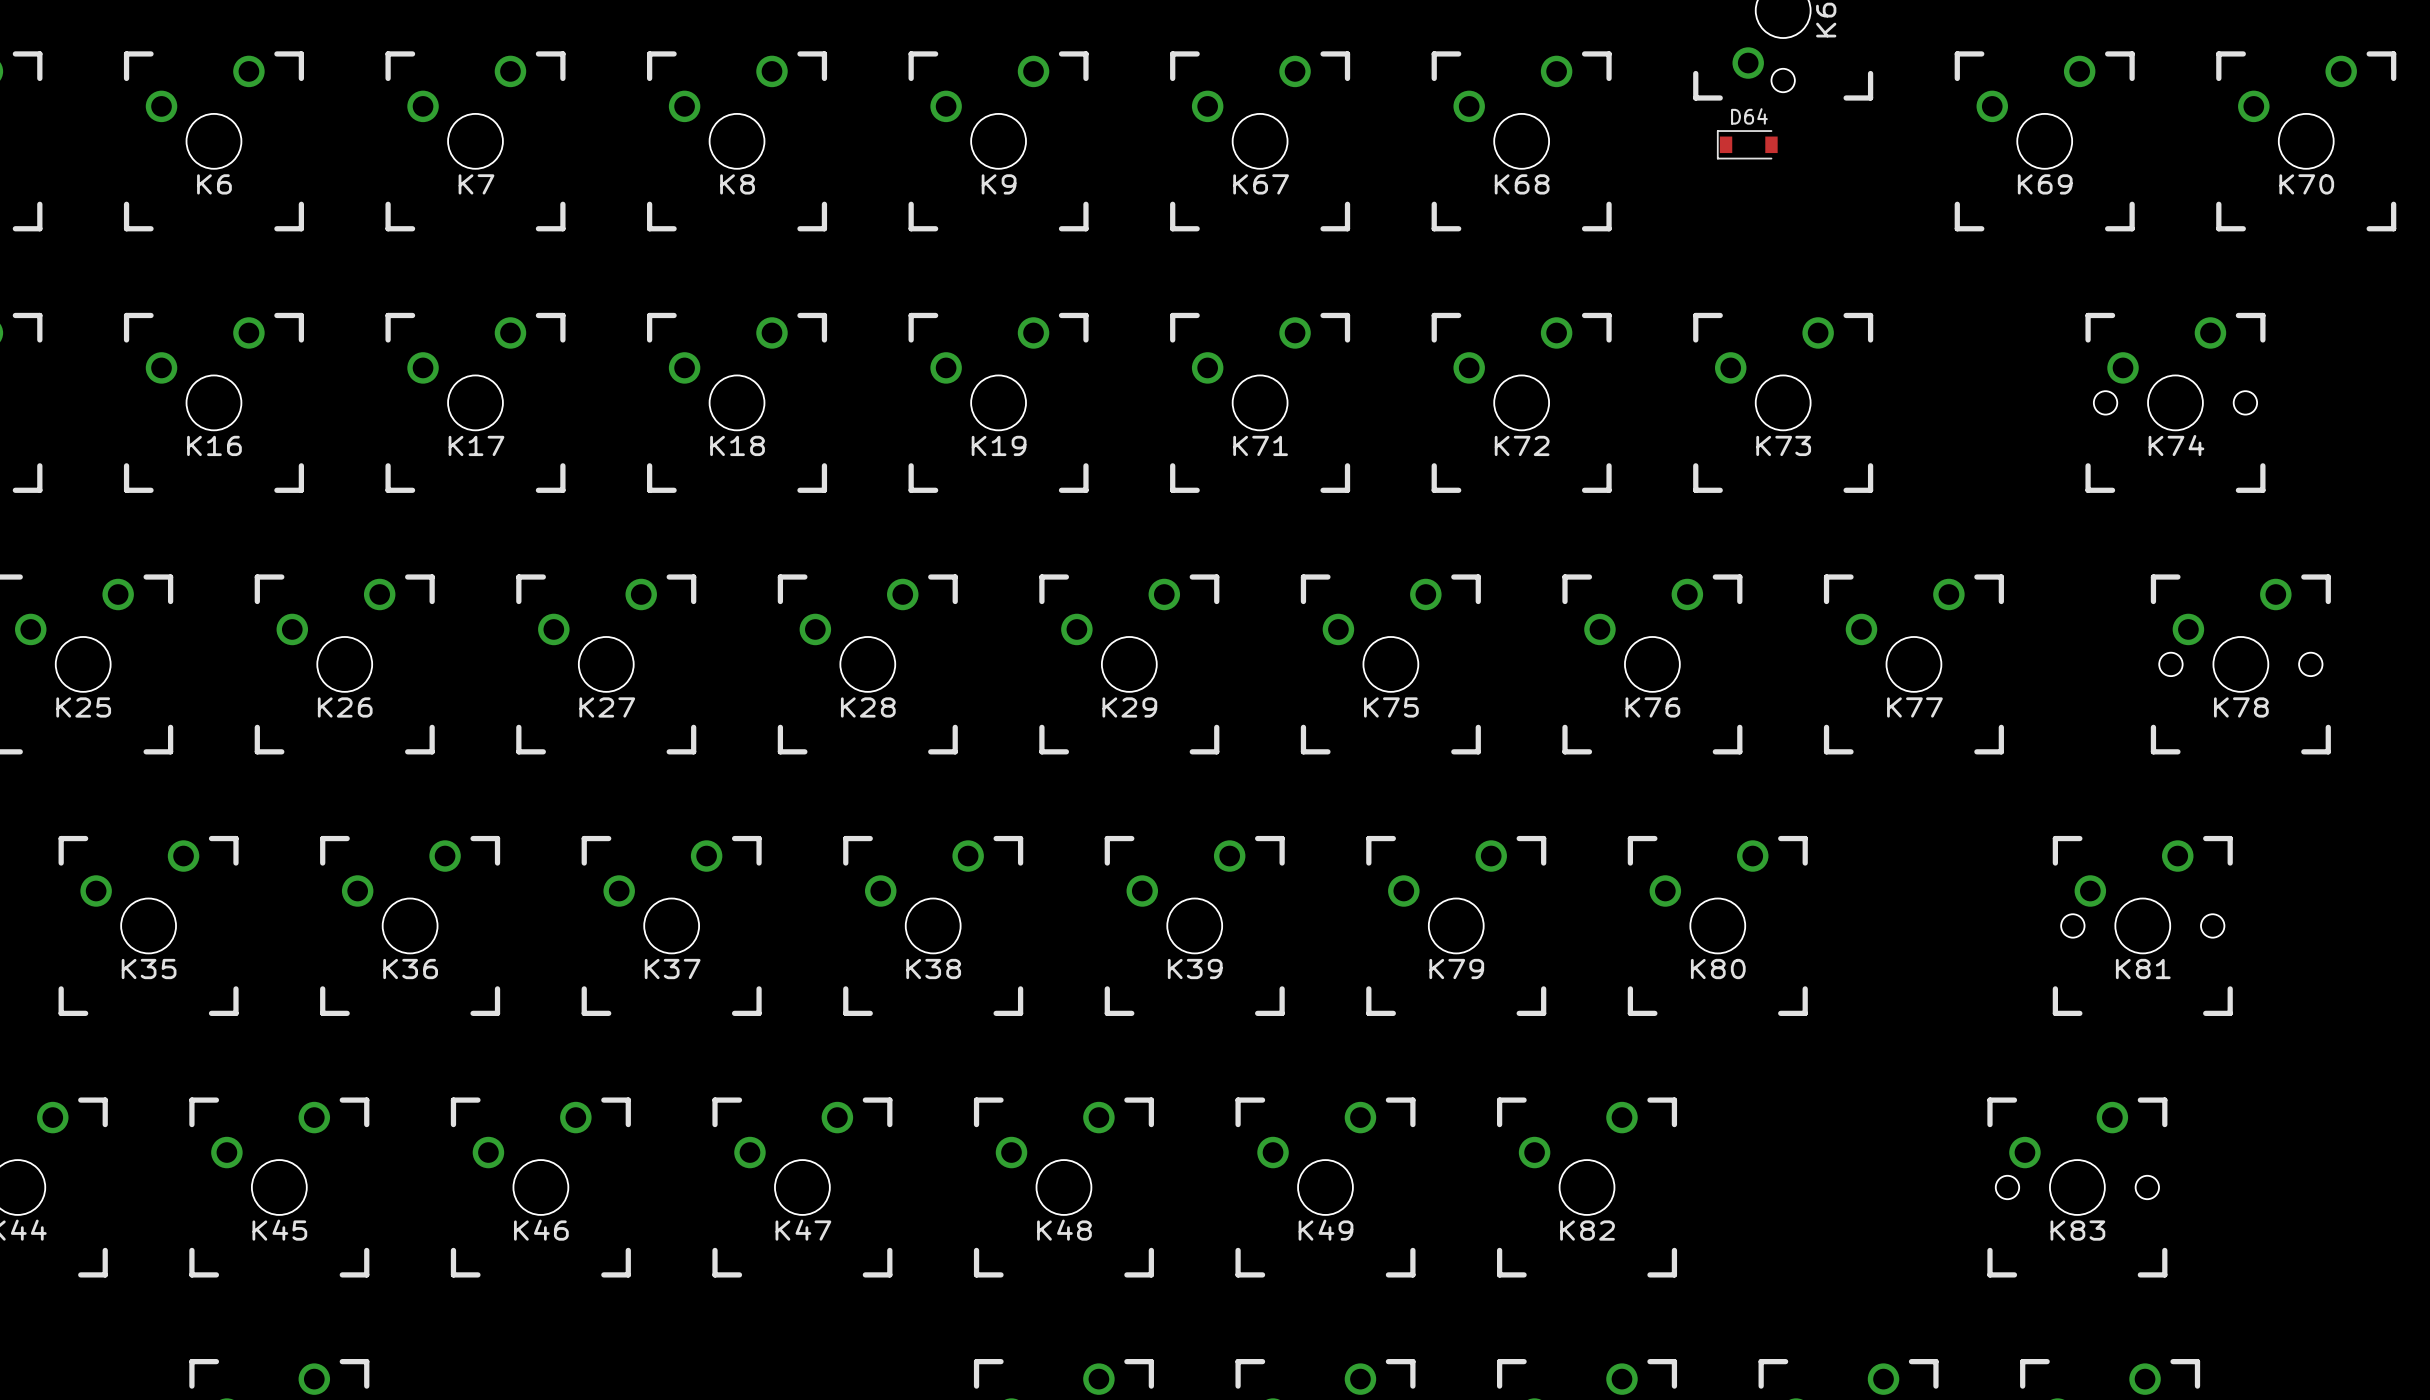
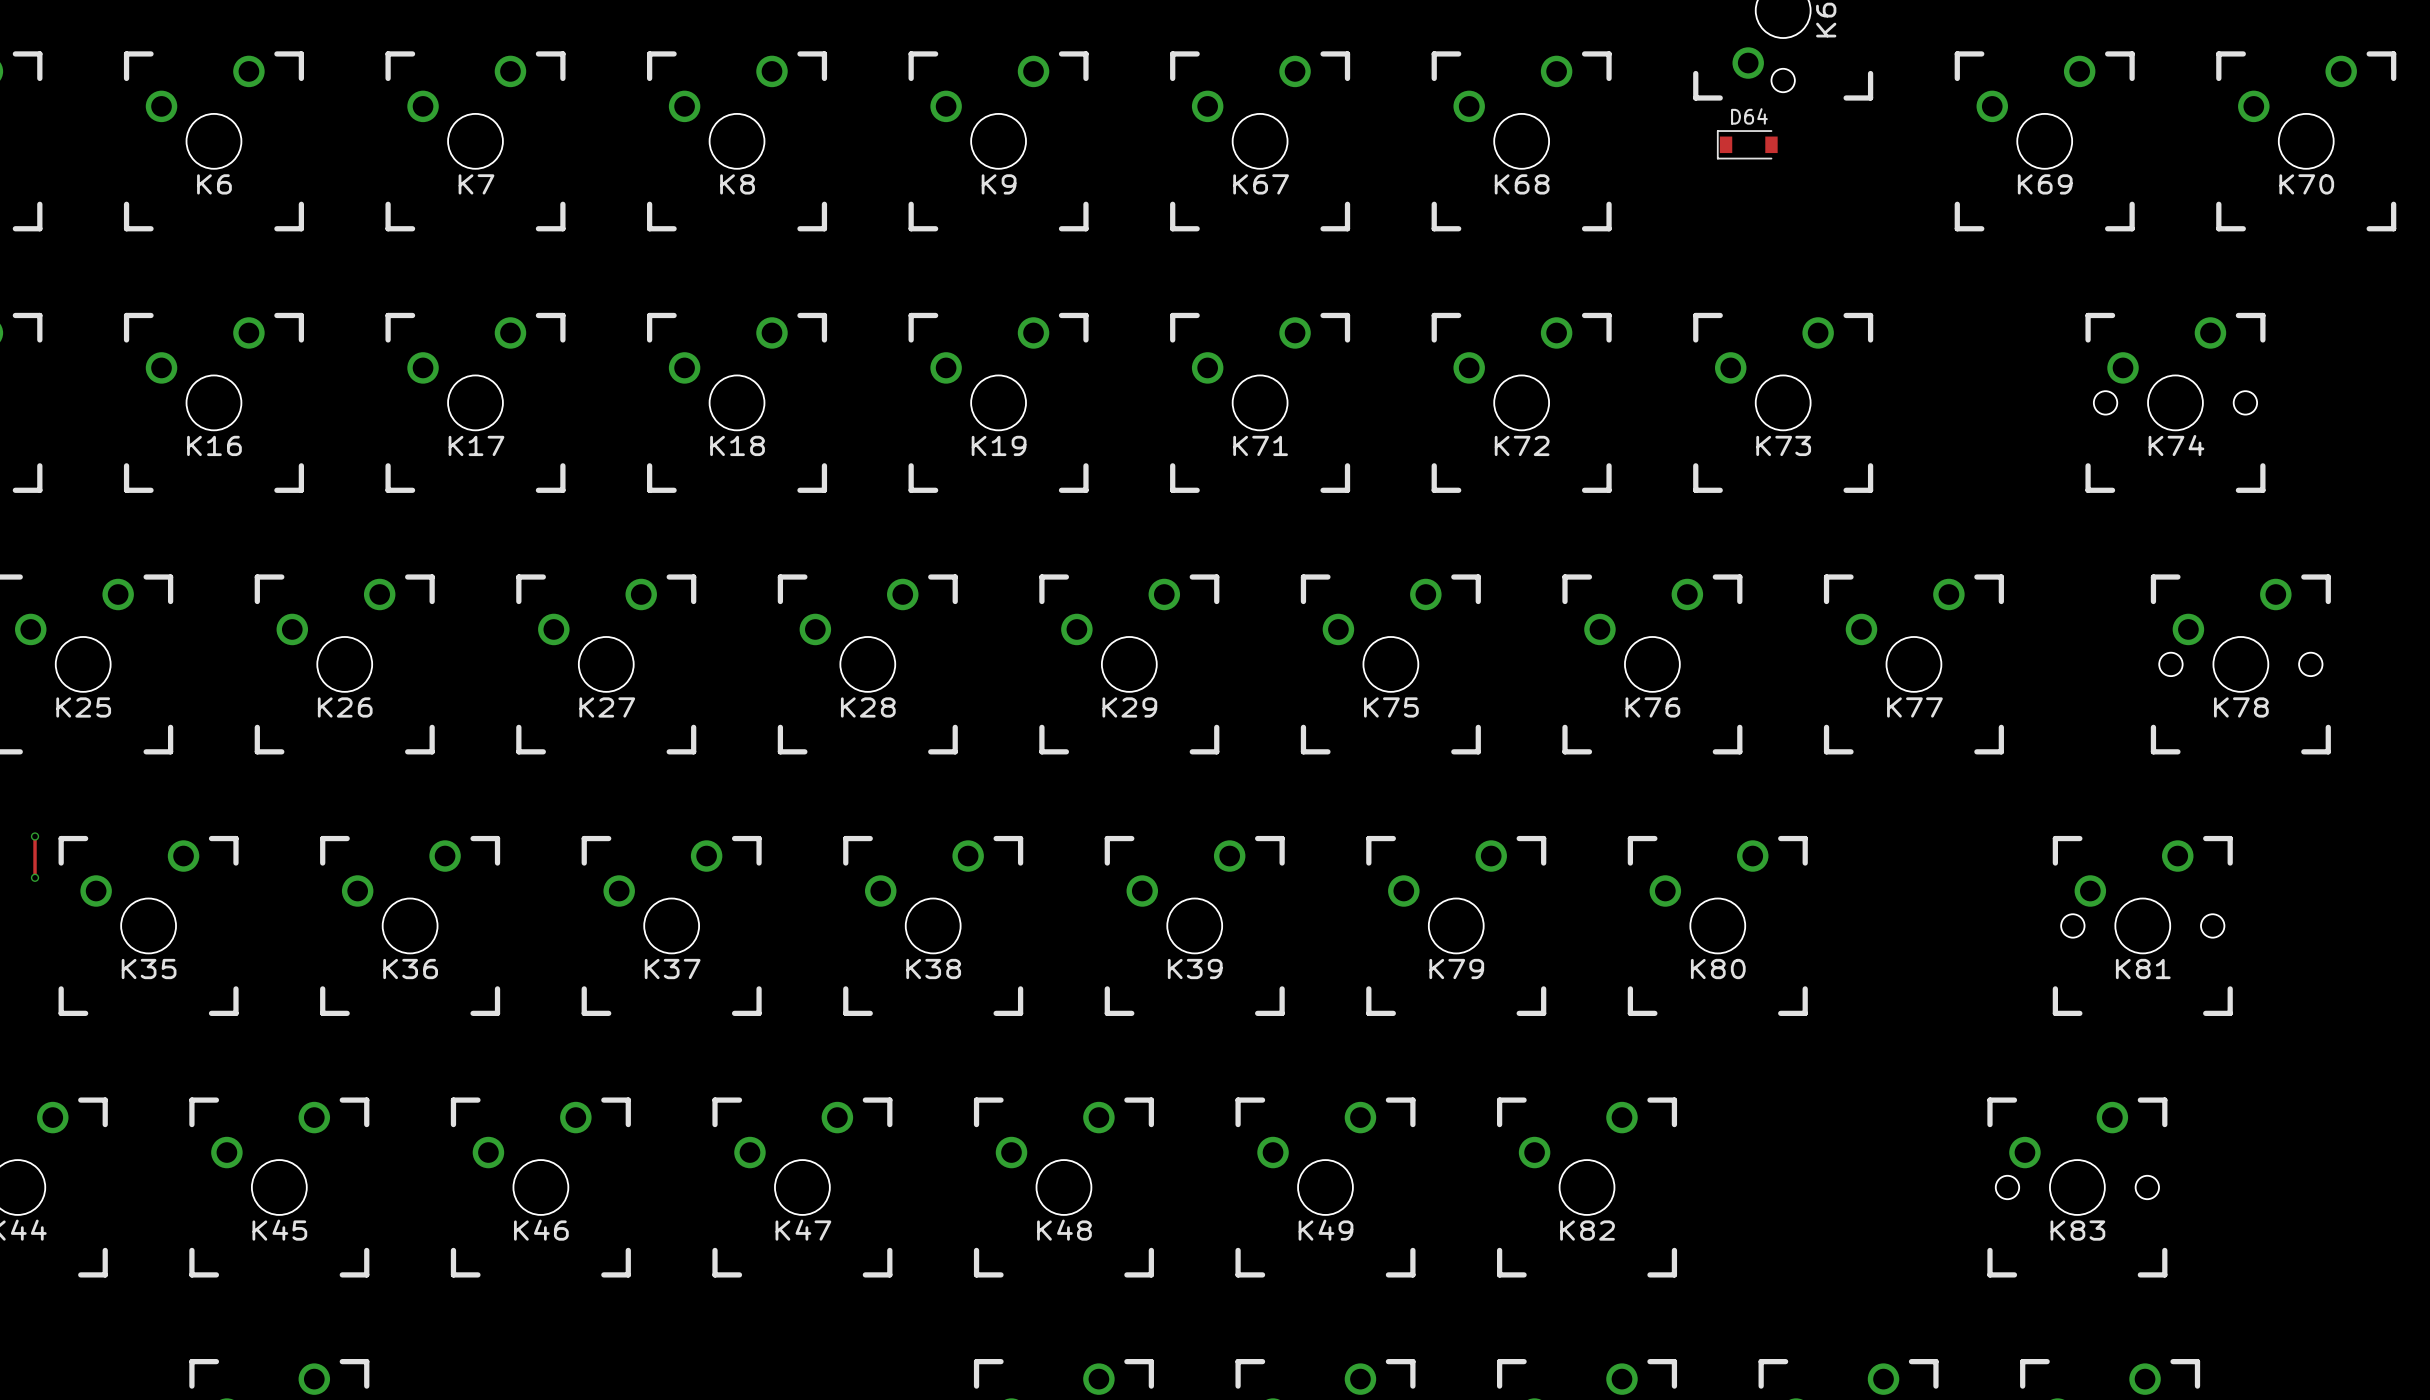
track: none -> (35, 836) (35, 877)
via: none -> (35, 836)
via: none -> (35, 877)

